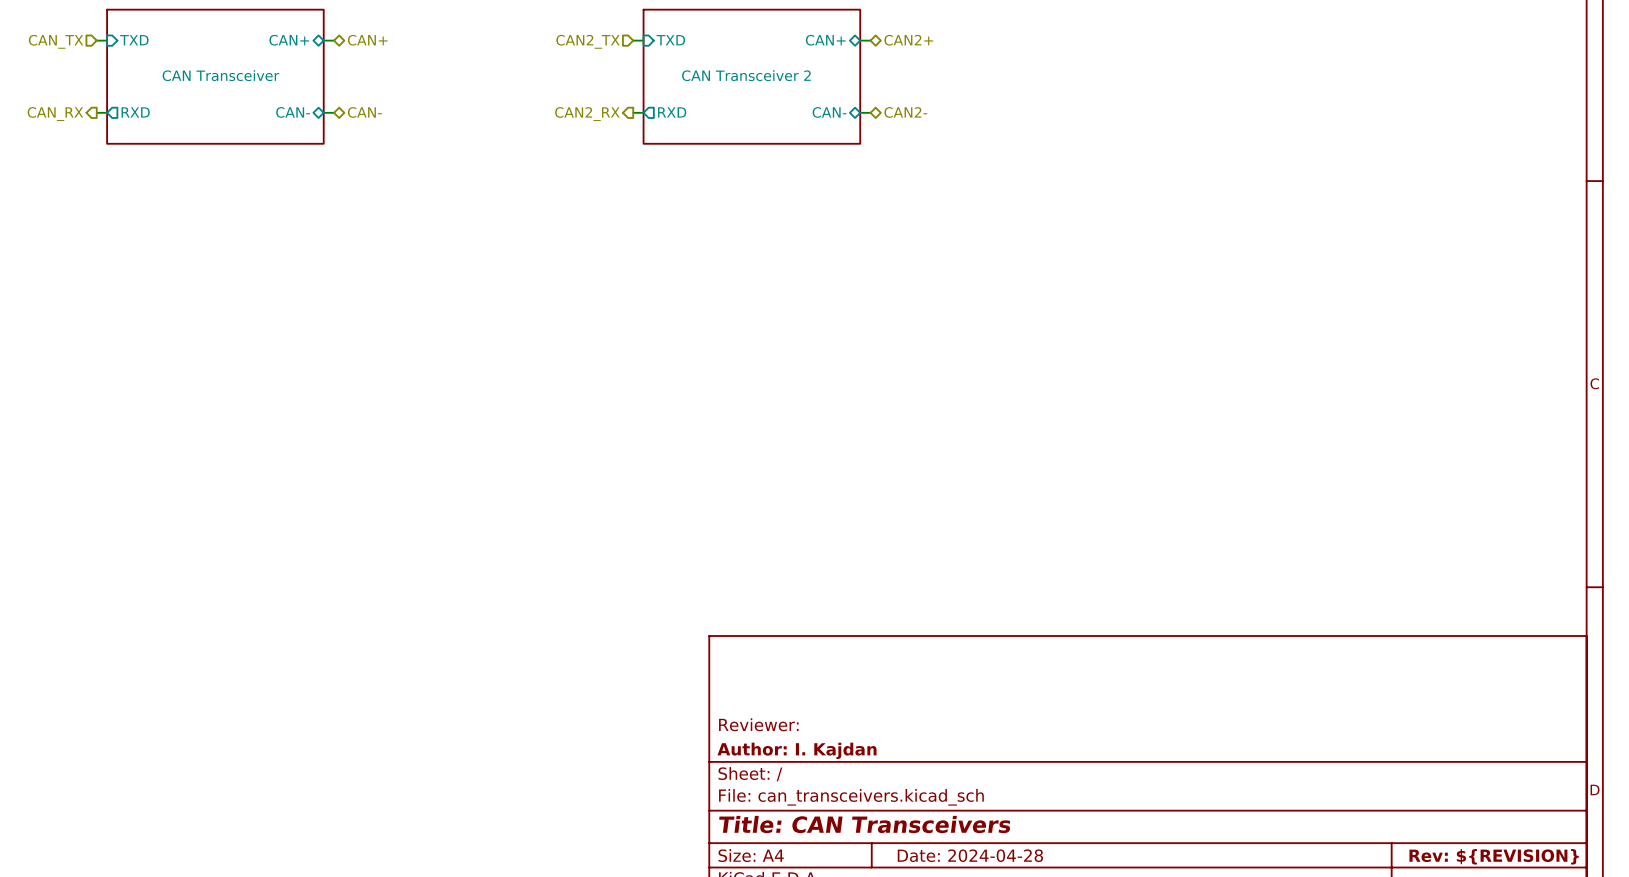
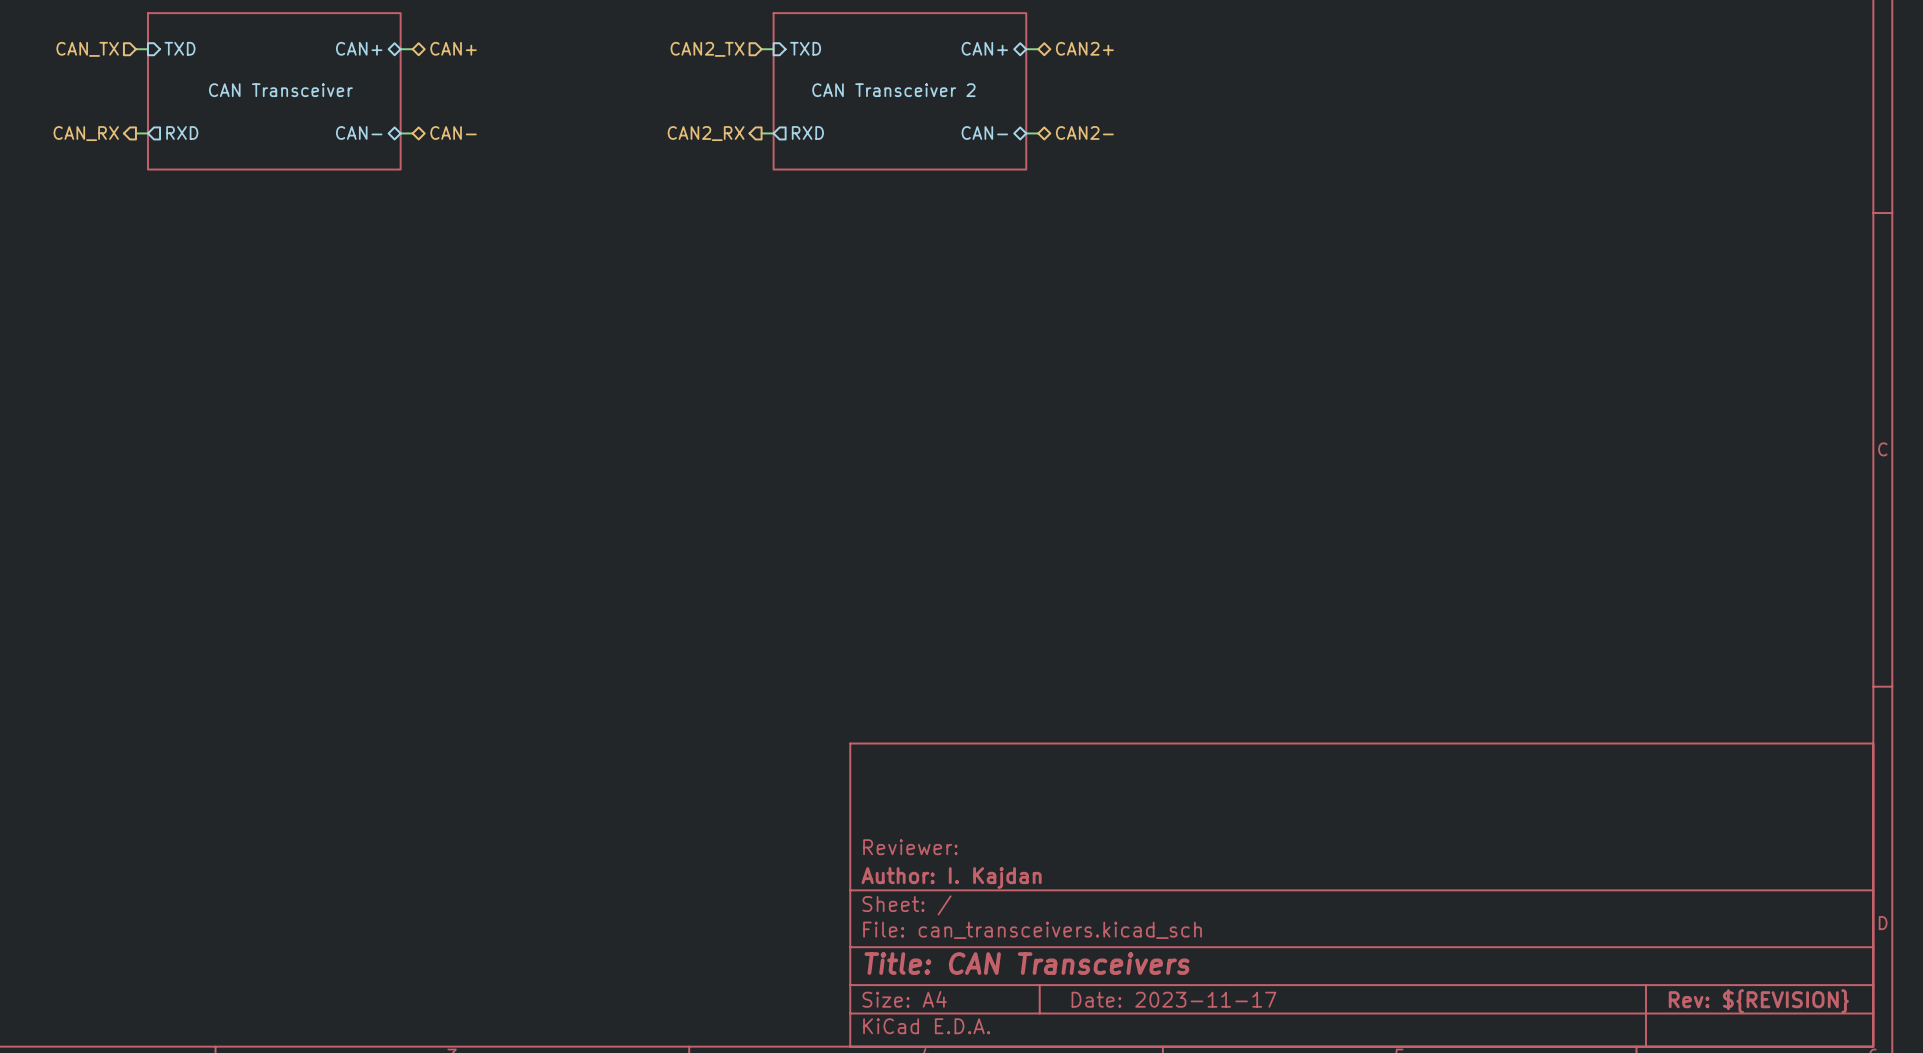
title block: Date: 2024-04-28 (970, 855) -> Date: 2023-11-17 (1173, 999)

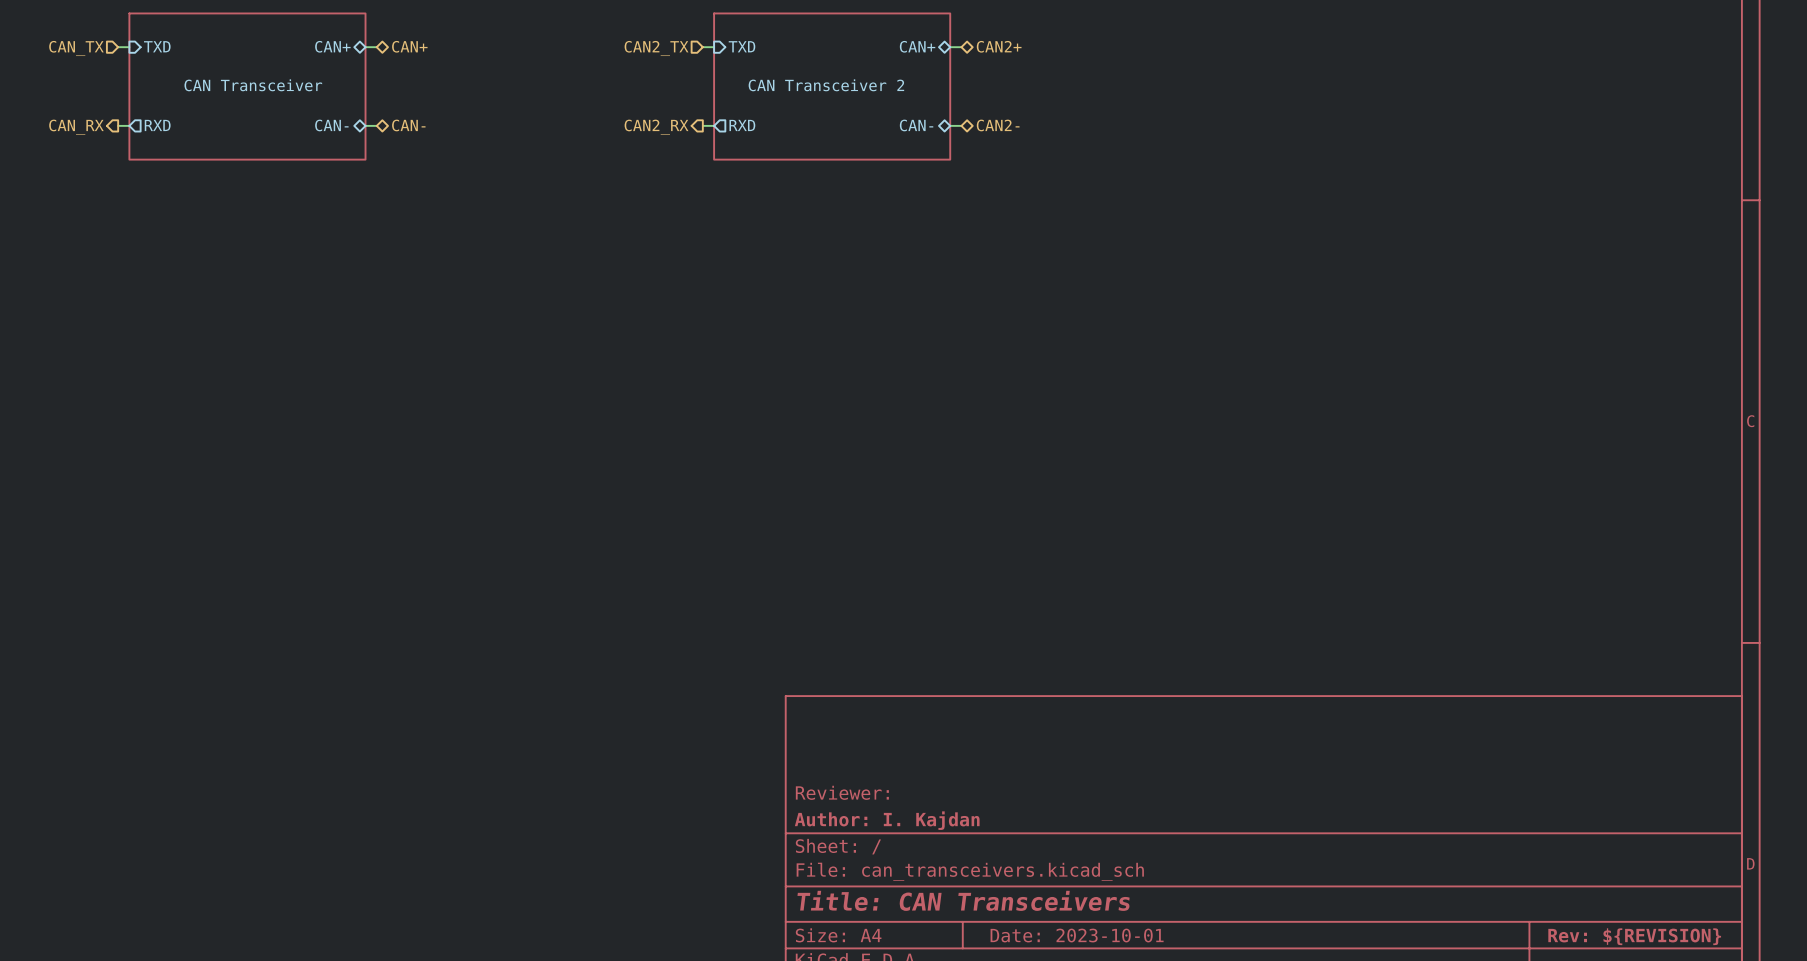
title block: Date: 2023-11-17 (1173, 999) -> Date: 2023-10-01 (1077, 935)

